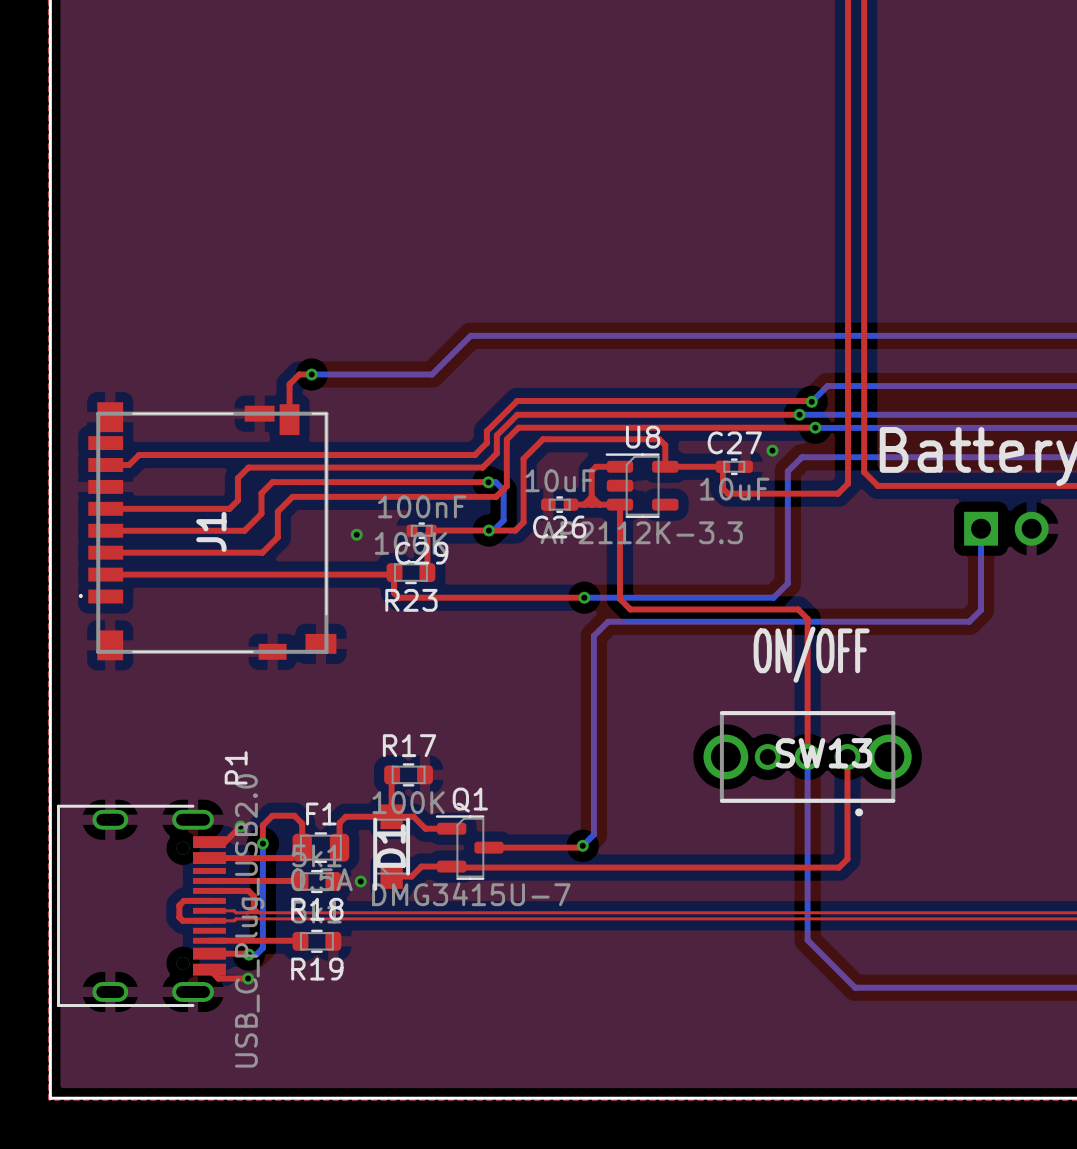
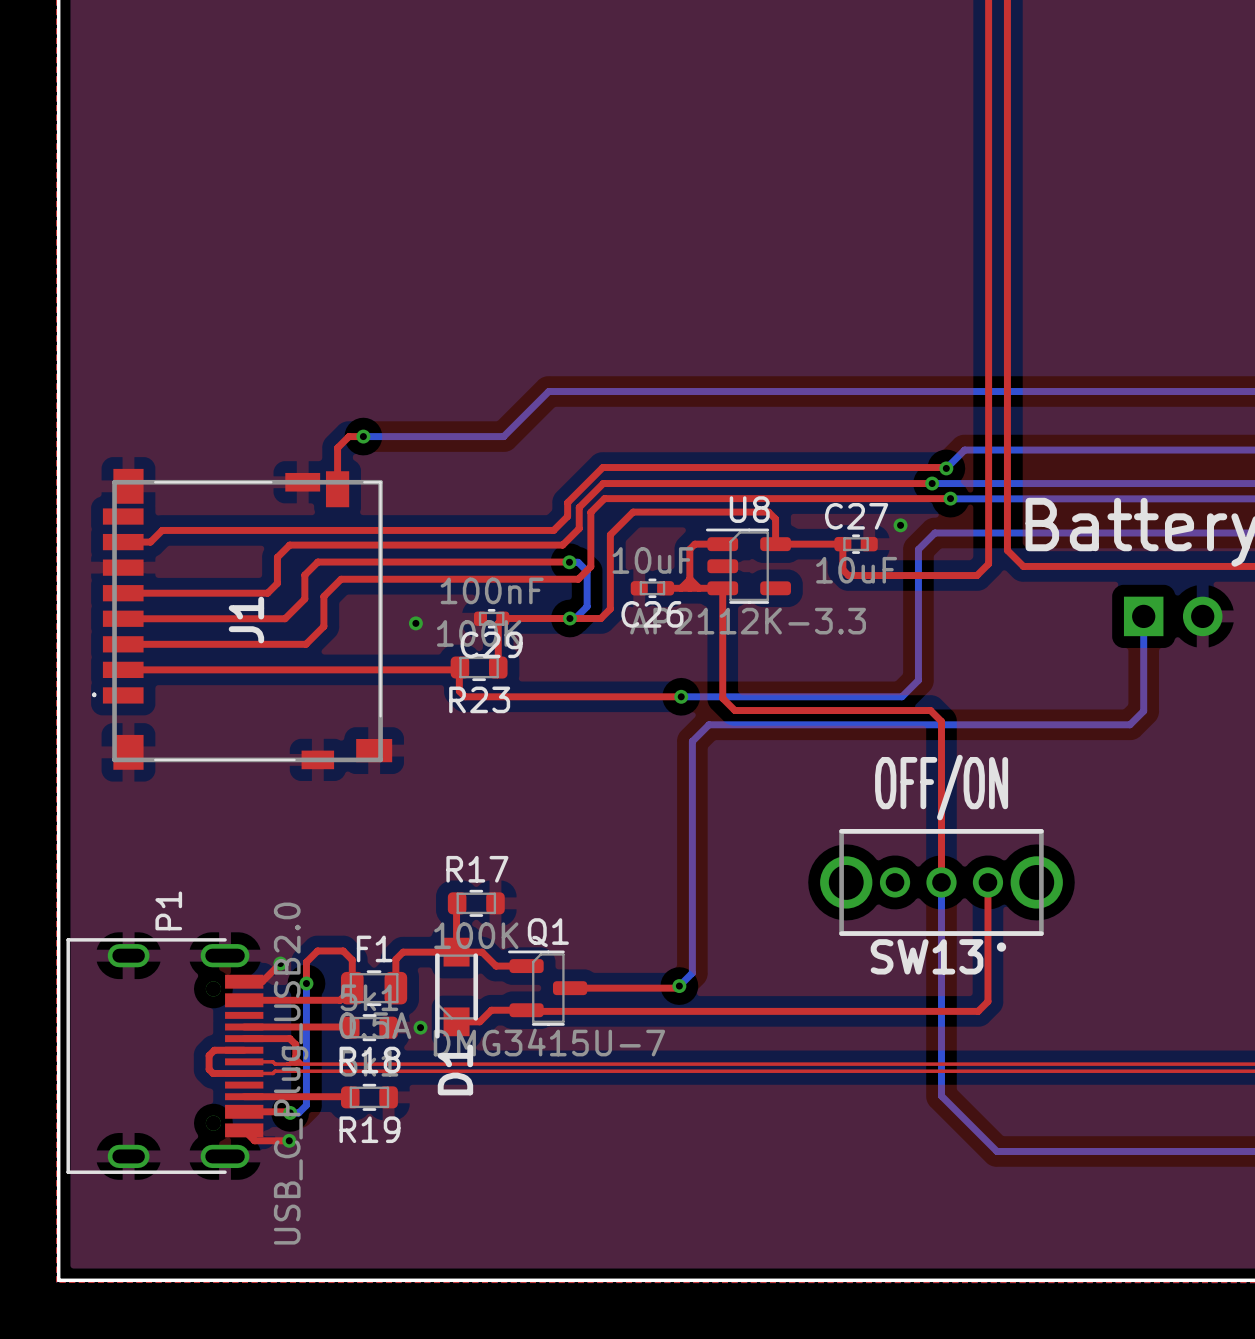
text: ON/OFF (811, 654) -> none
text: none -> OFF/ON (941, 787)
SW13 name position: SW13 (823, 753) -> SW13 (927, 956)
P1 name position: P1 (236, 767) -> P1 (168, 910)
D1 name position: D1 (390, 846) -> D1 (455, 1069)

